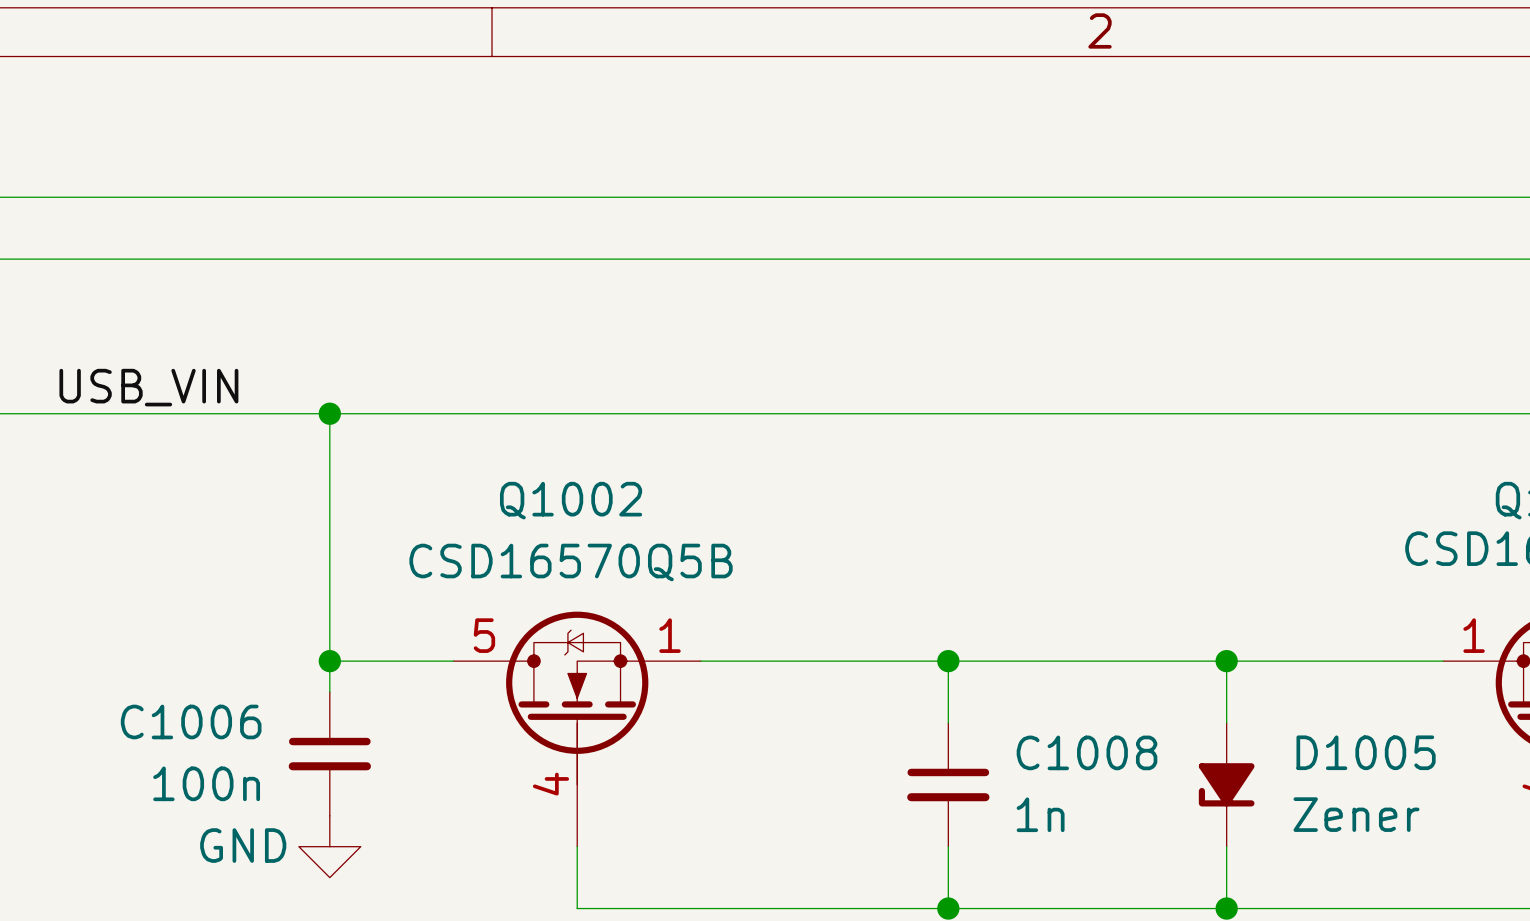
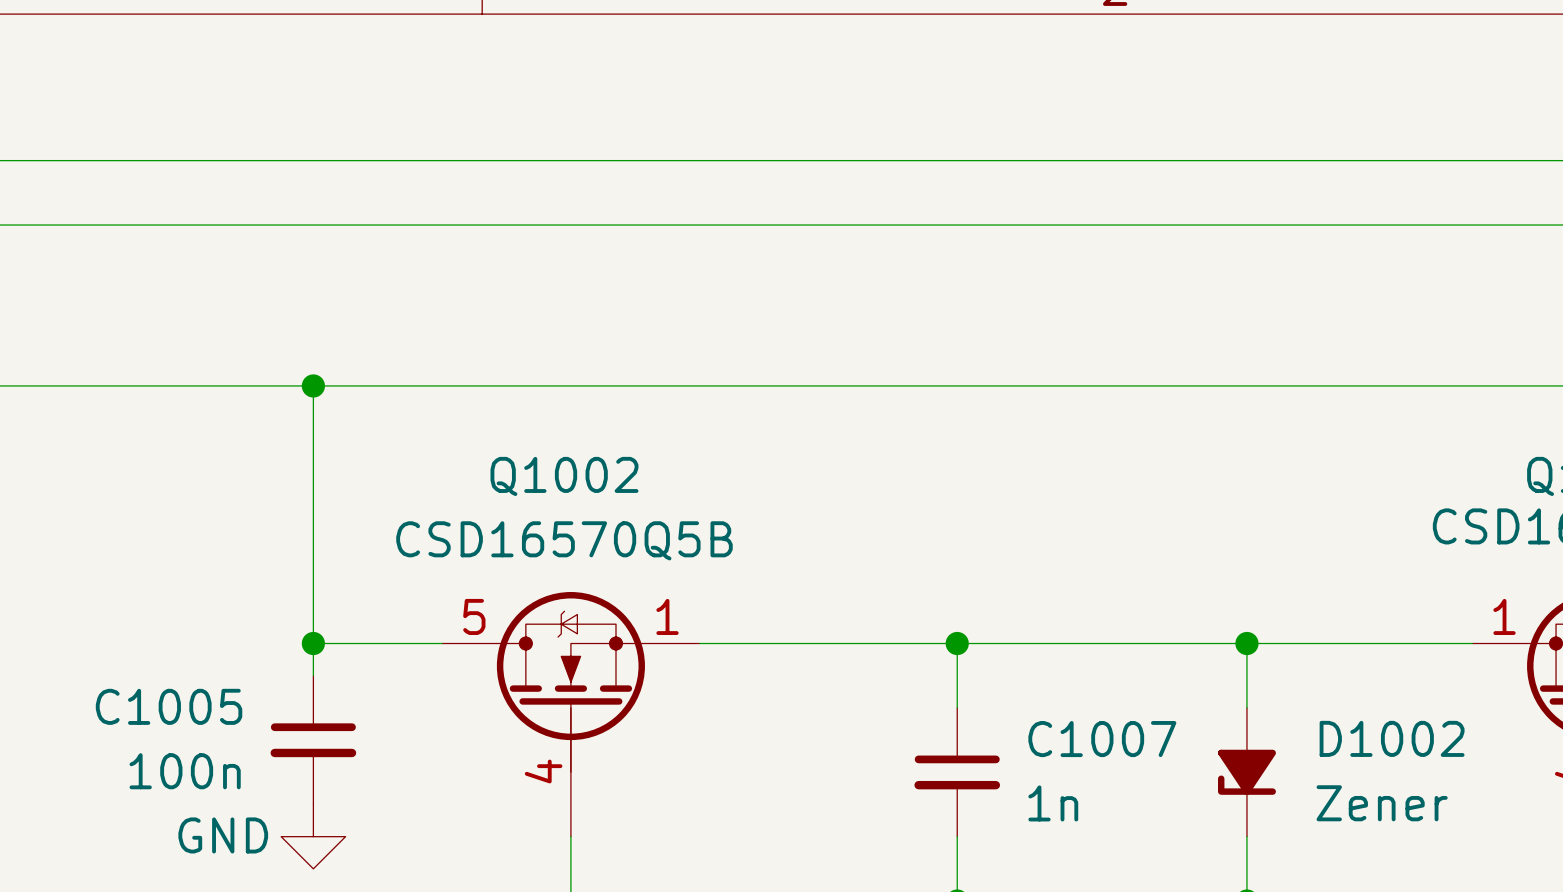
label: USB_VIN (148, 387) -> none
C1006 name: C1006 (191, 721) -> C1005 (169, 706)
C1008 name: C1008 (1086, 752) -> C1007 (1102, 739)
D1005 name: D1005 (1366, 752) -> D1002 (1392, 738)

